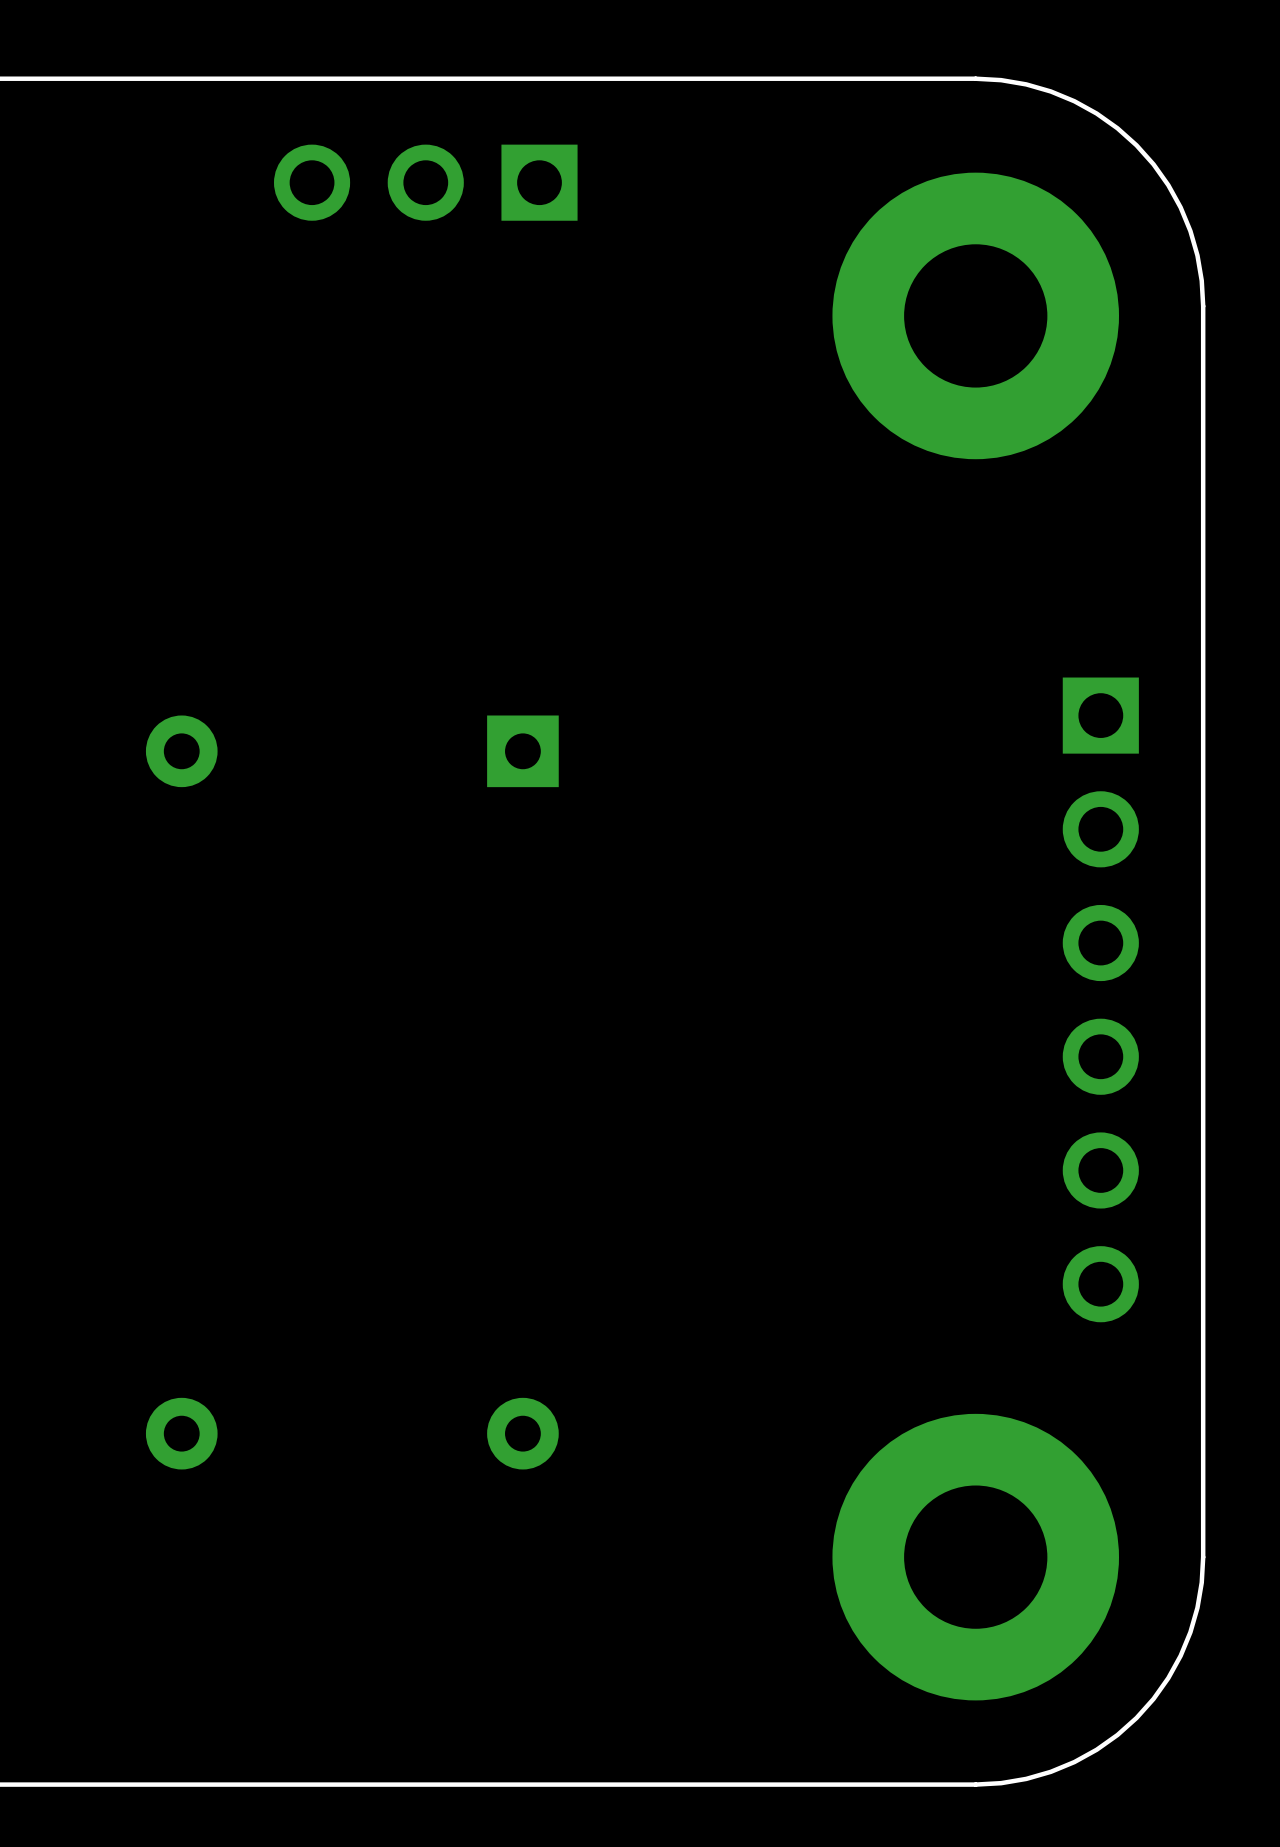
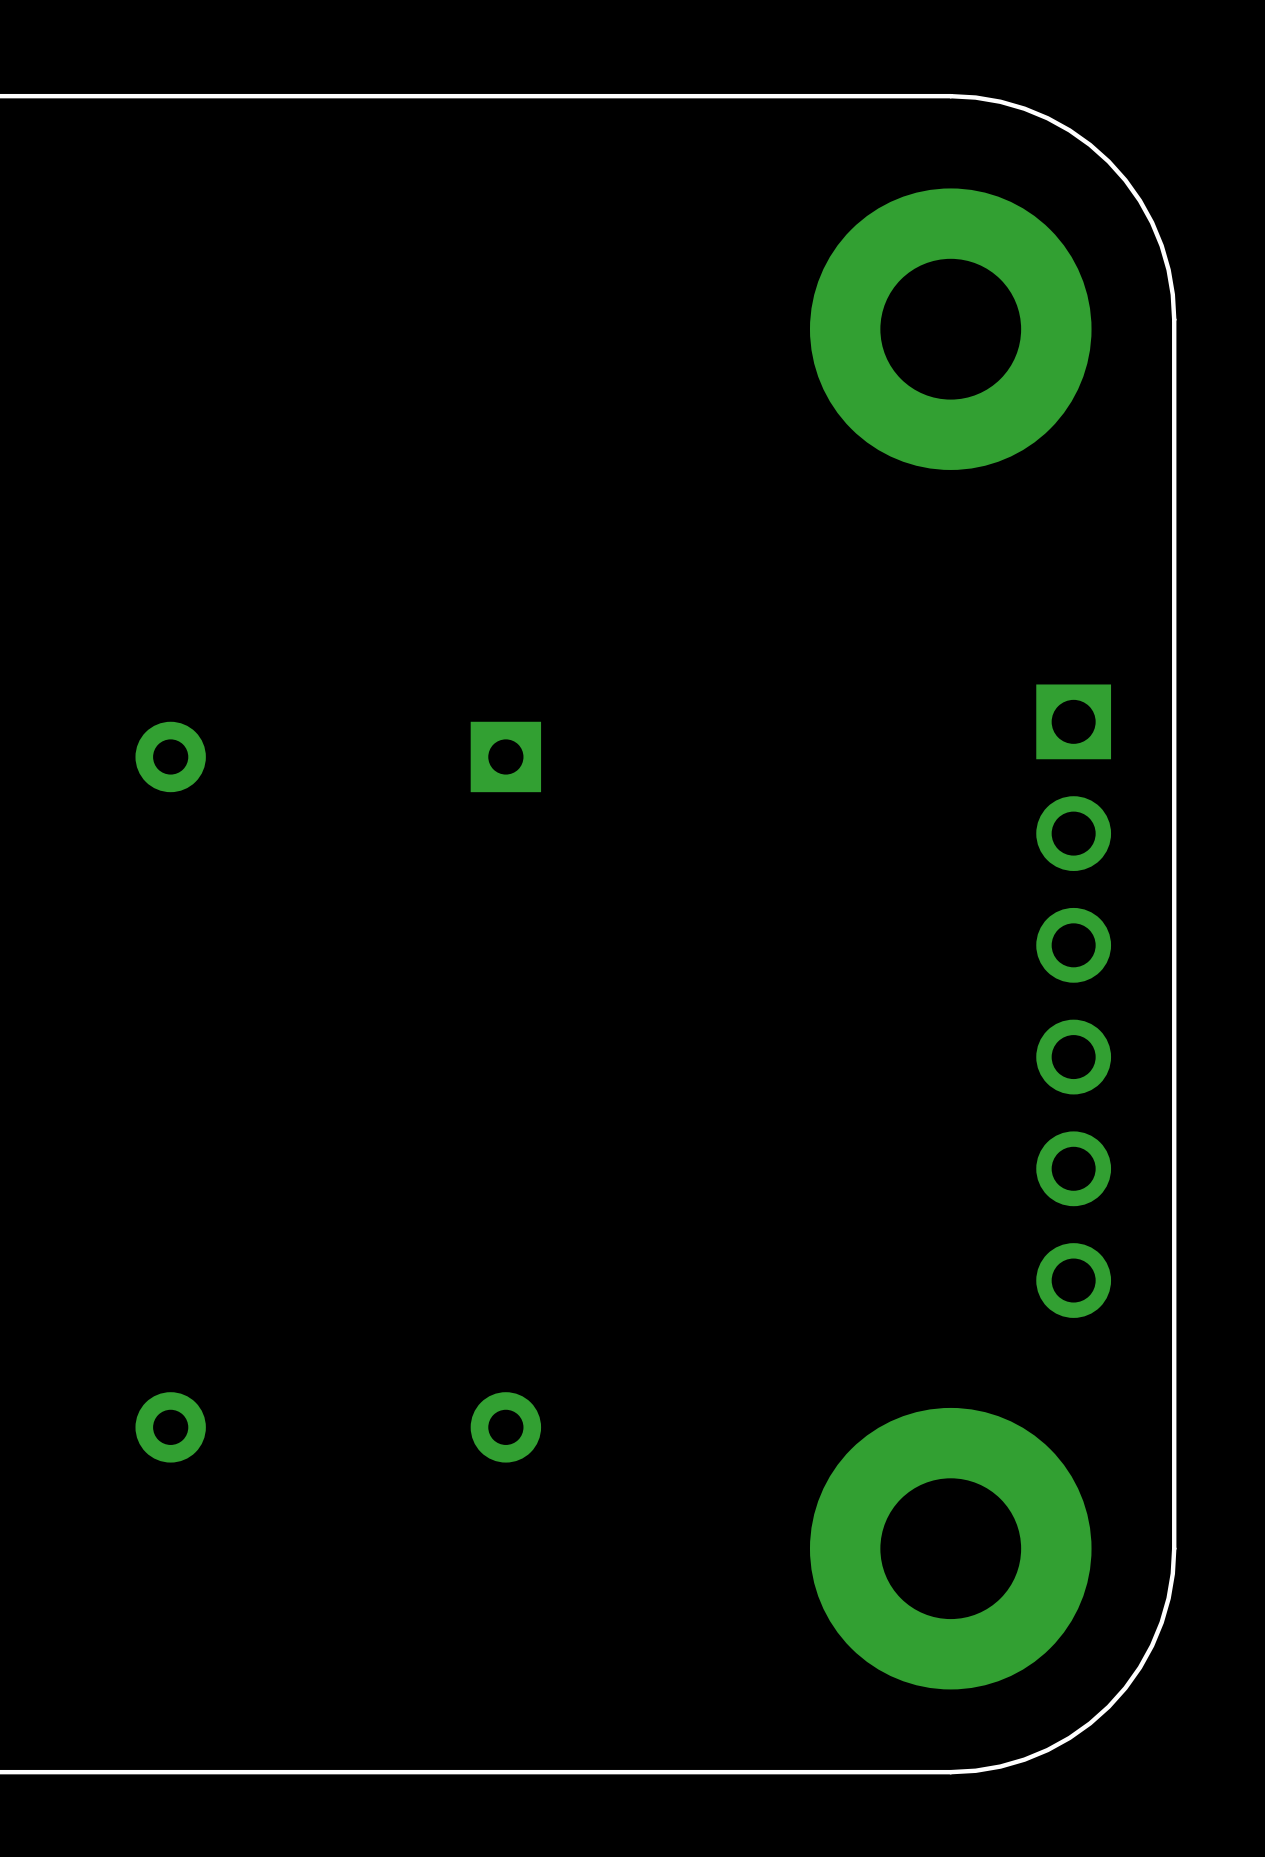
part: (425, 182) -> none

